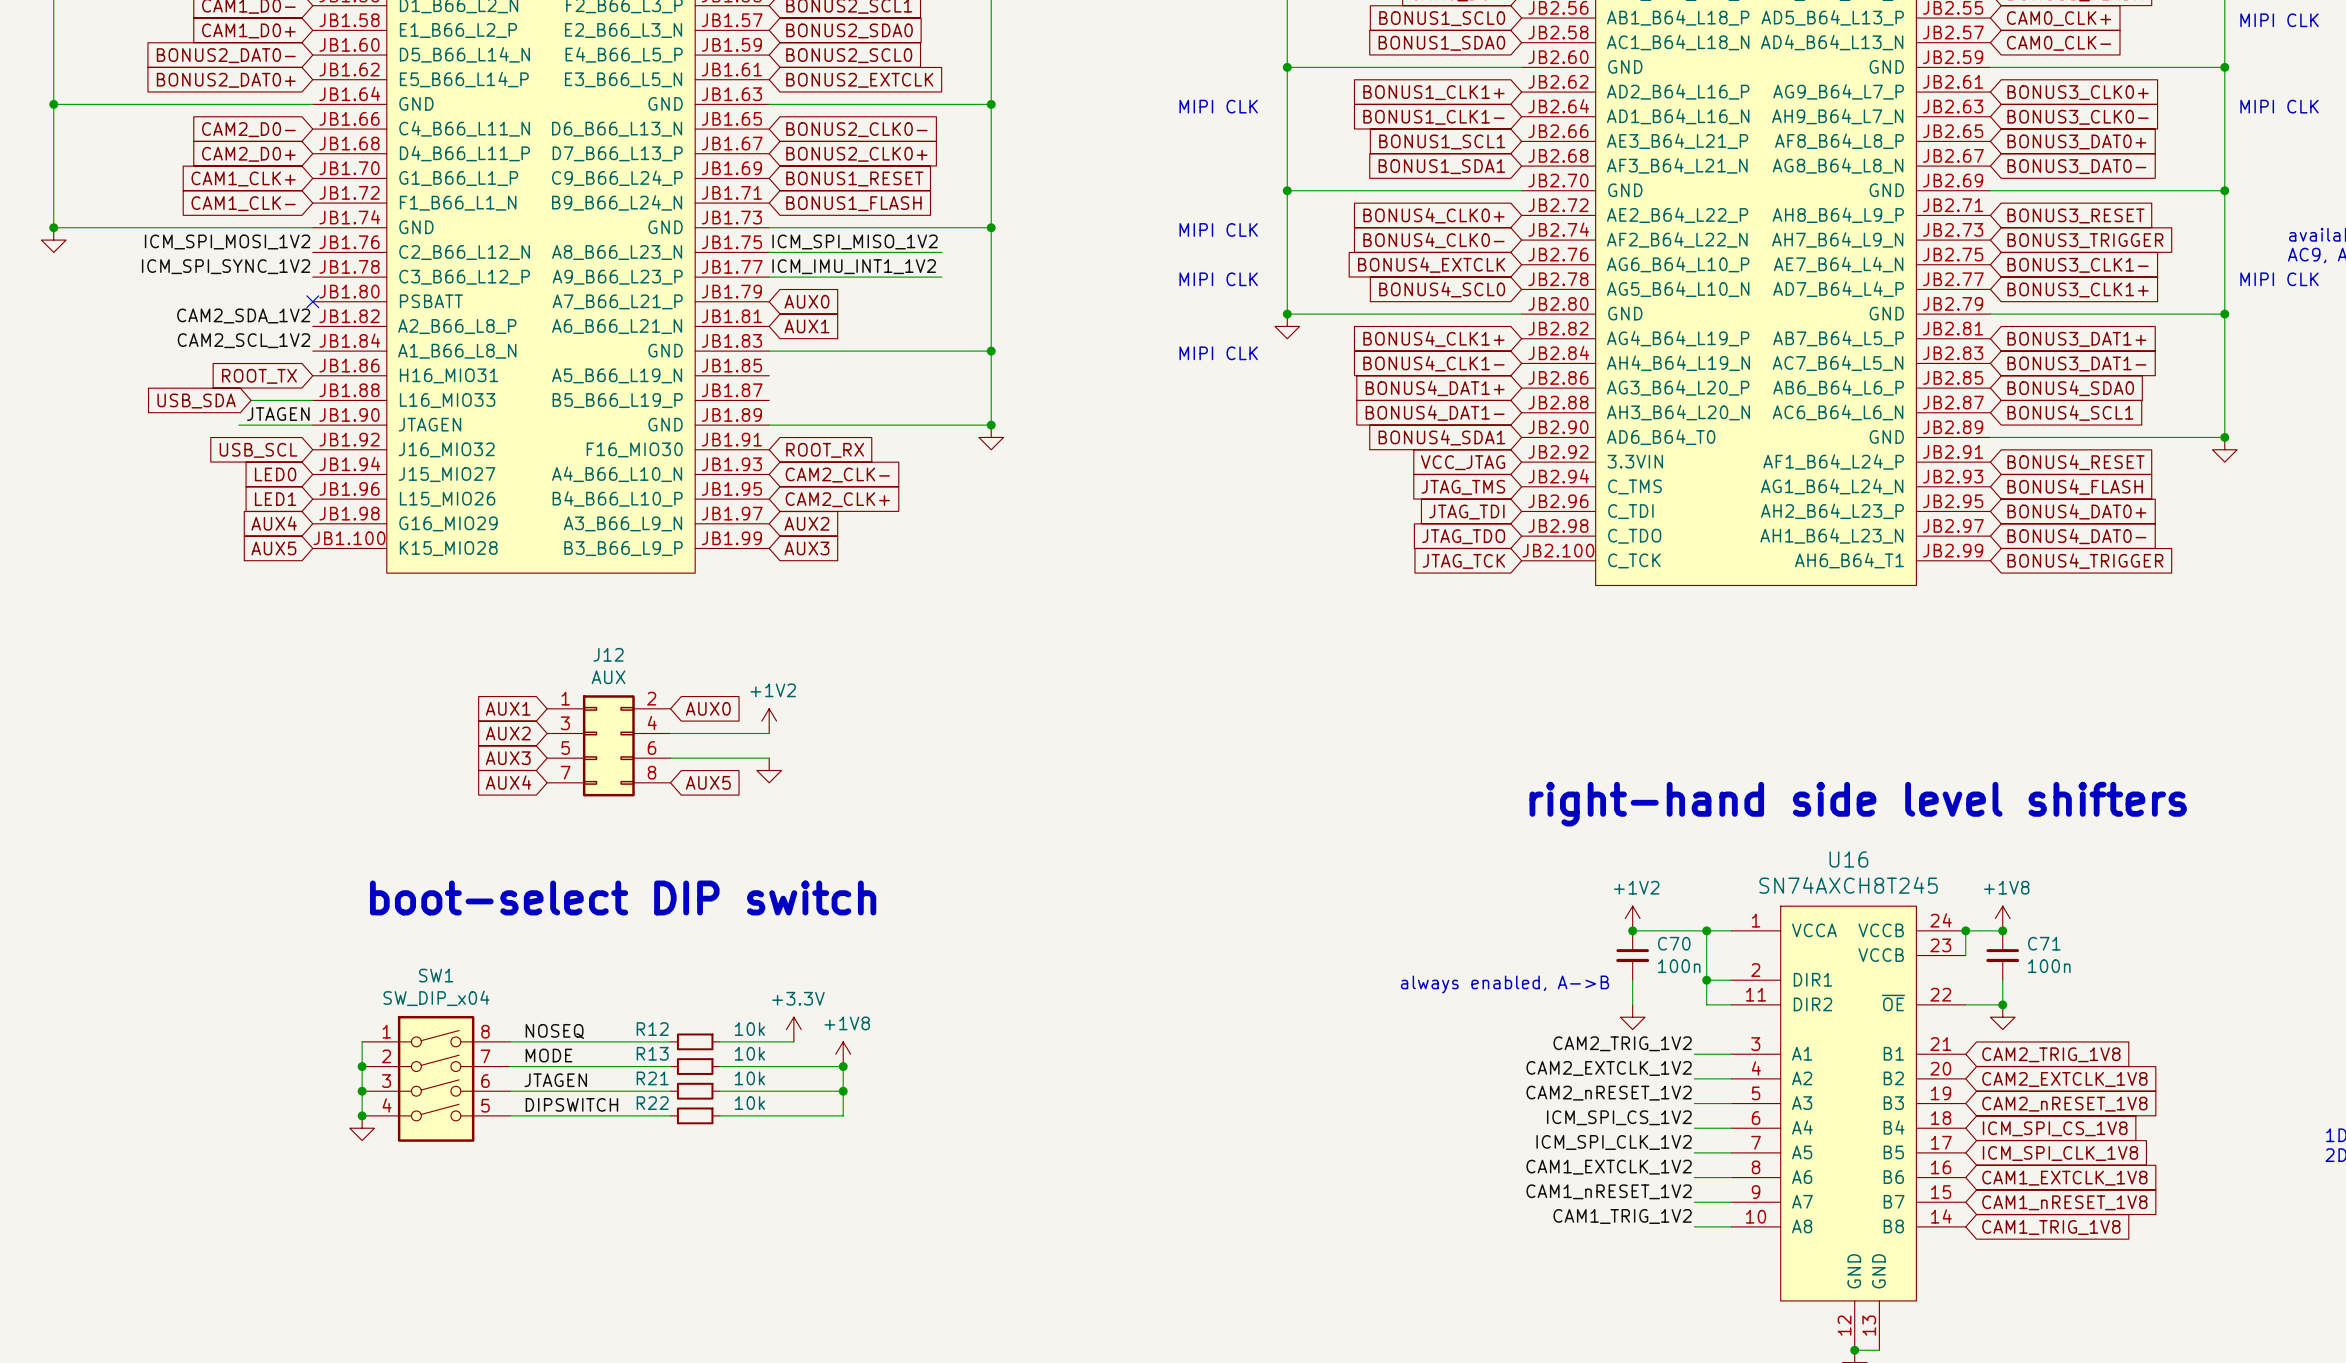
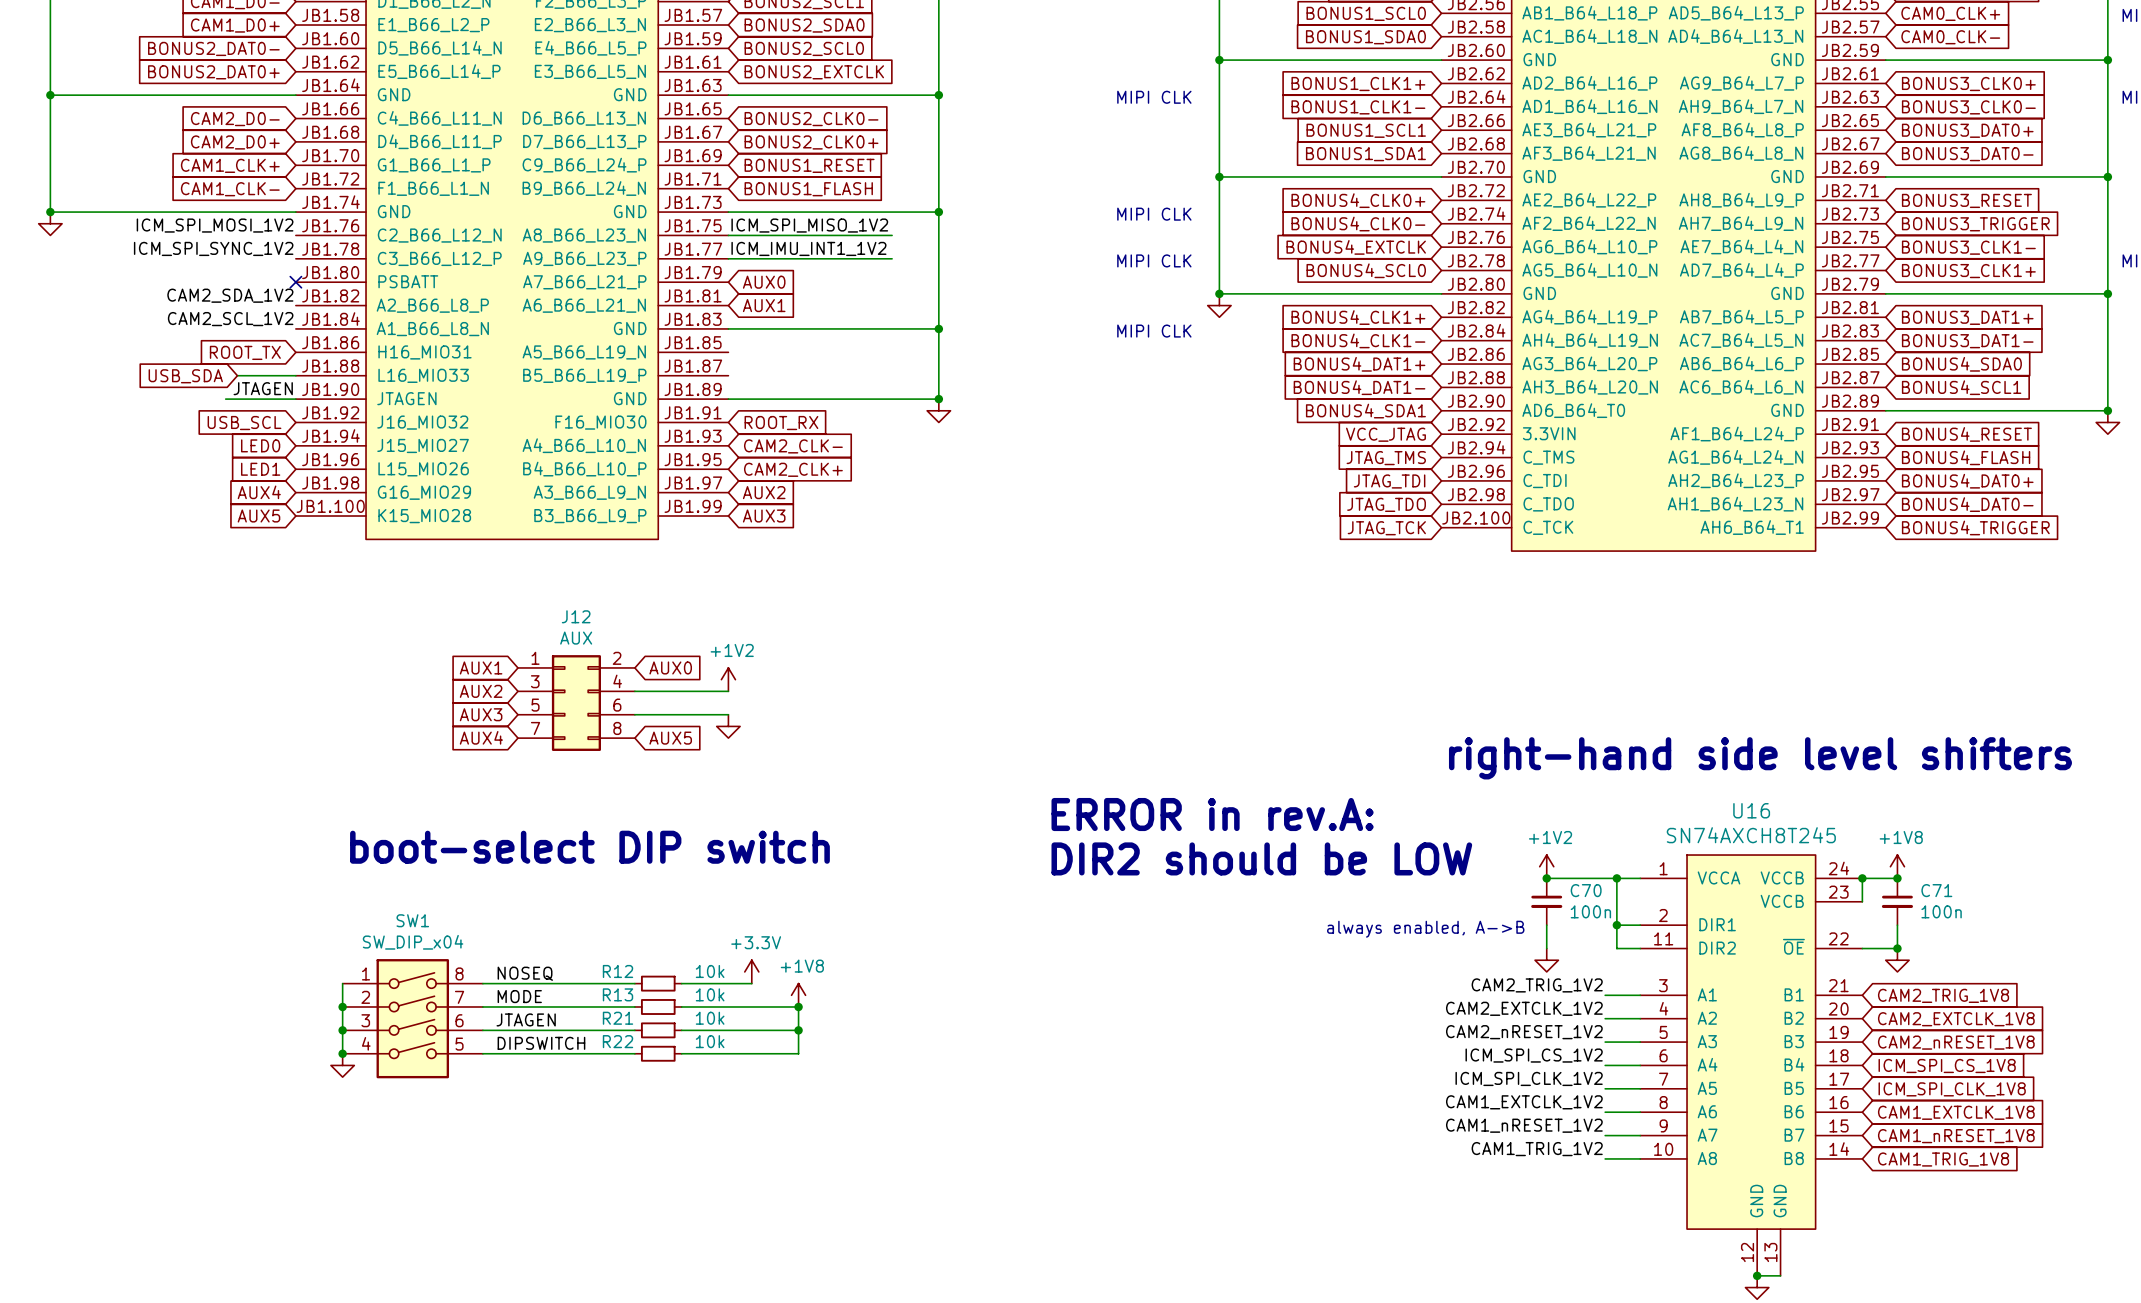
text: none -> ERROR in rev.A: (1212, 814)
text: none -> DIR2 should be LOW (1261, 858)

